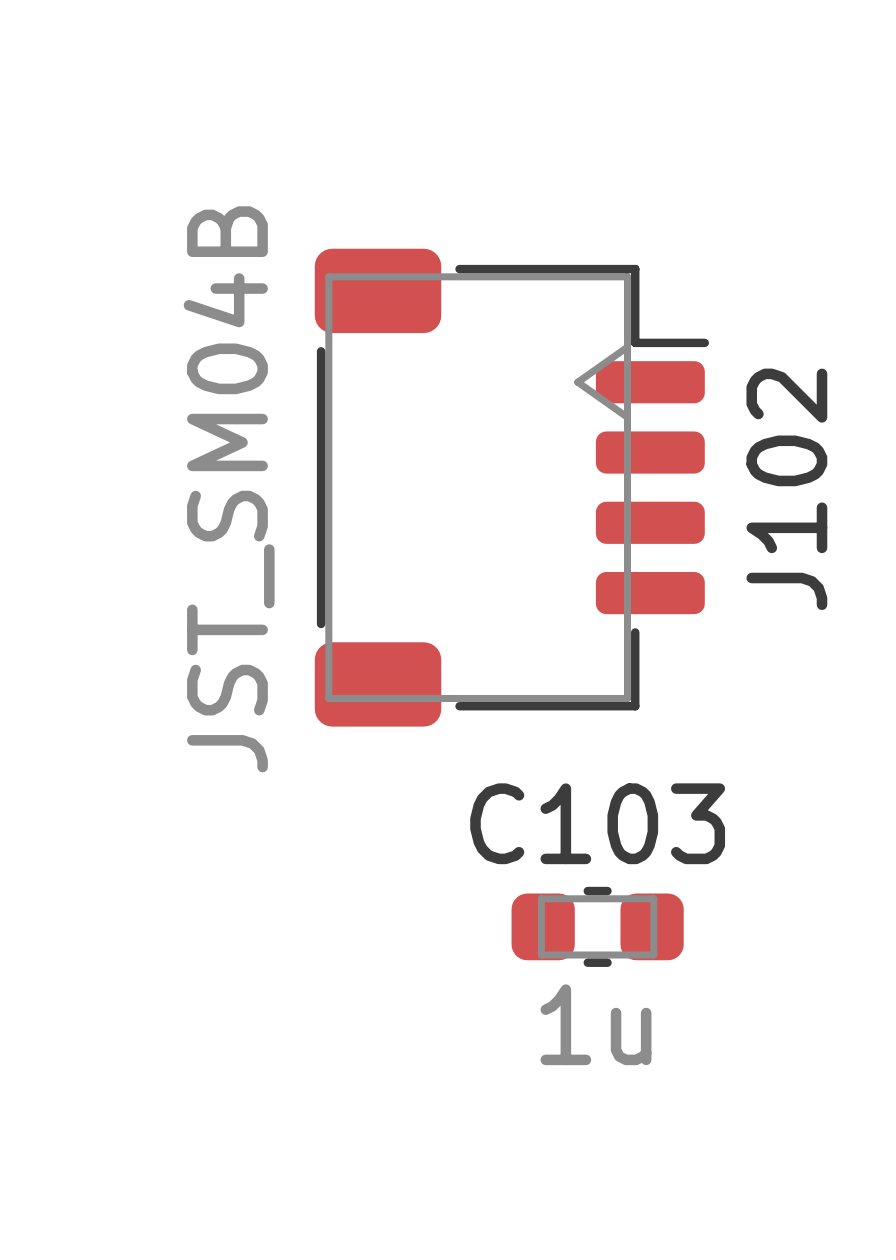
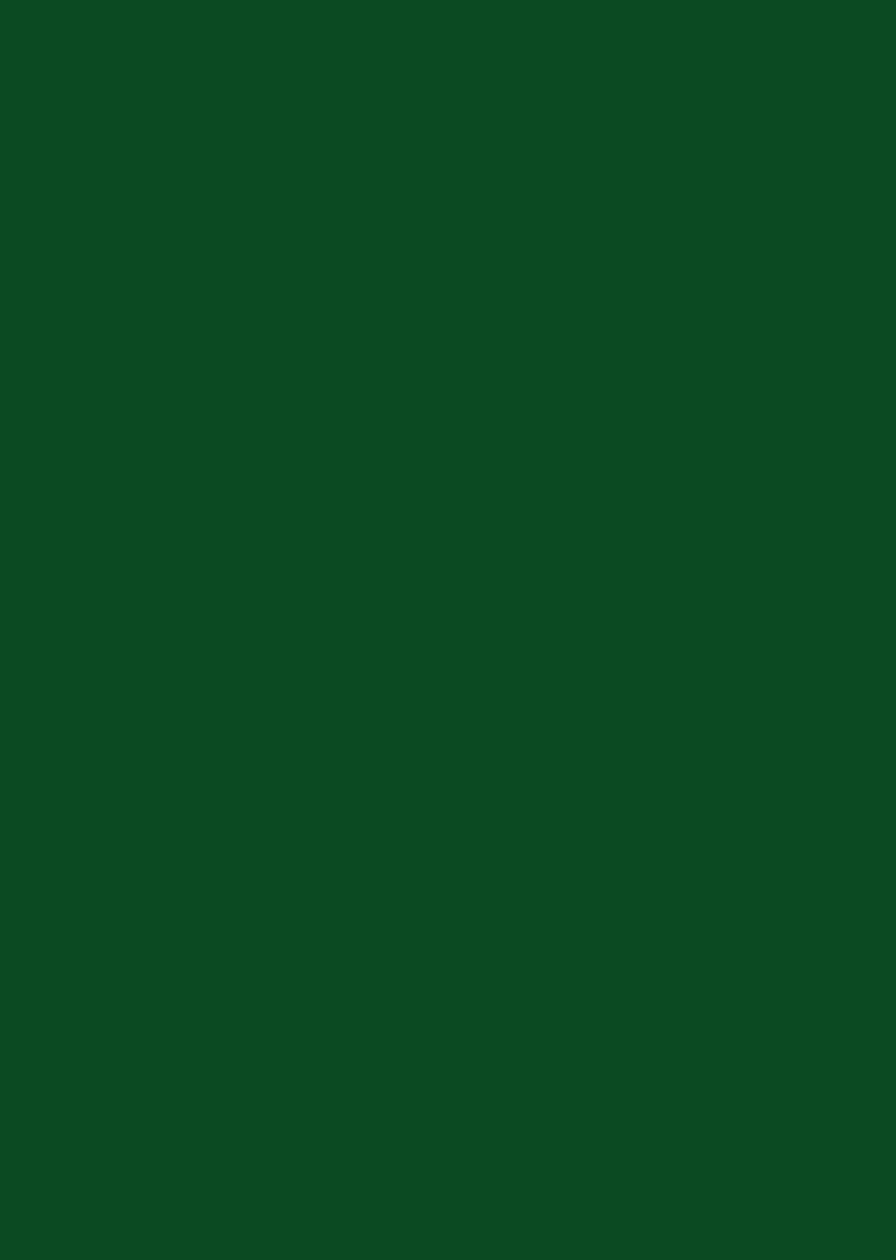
J102: JST_SM04B (511, 487) -> none
C103: 1u (597, 926) -> none

